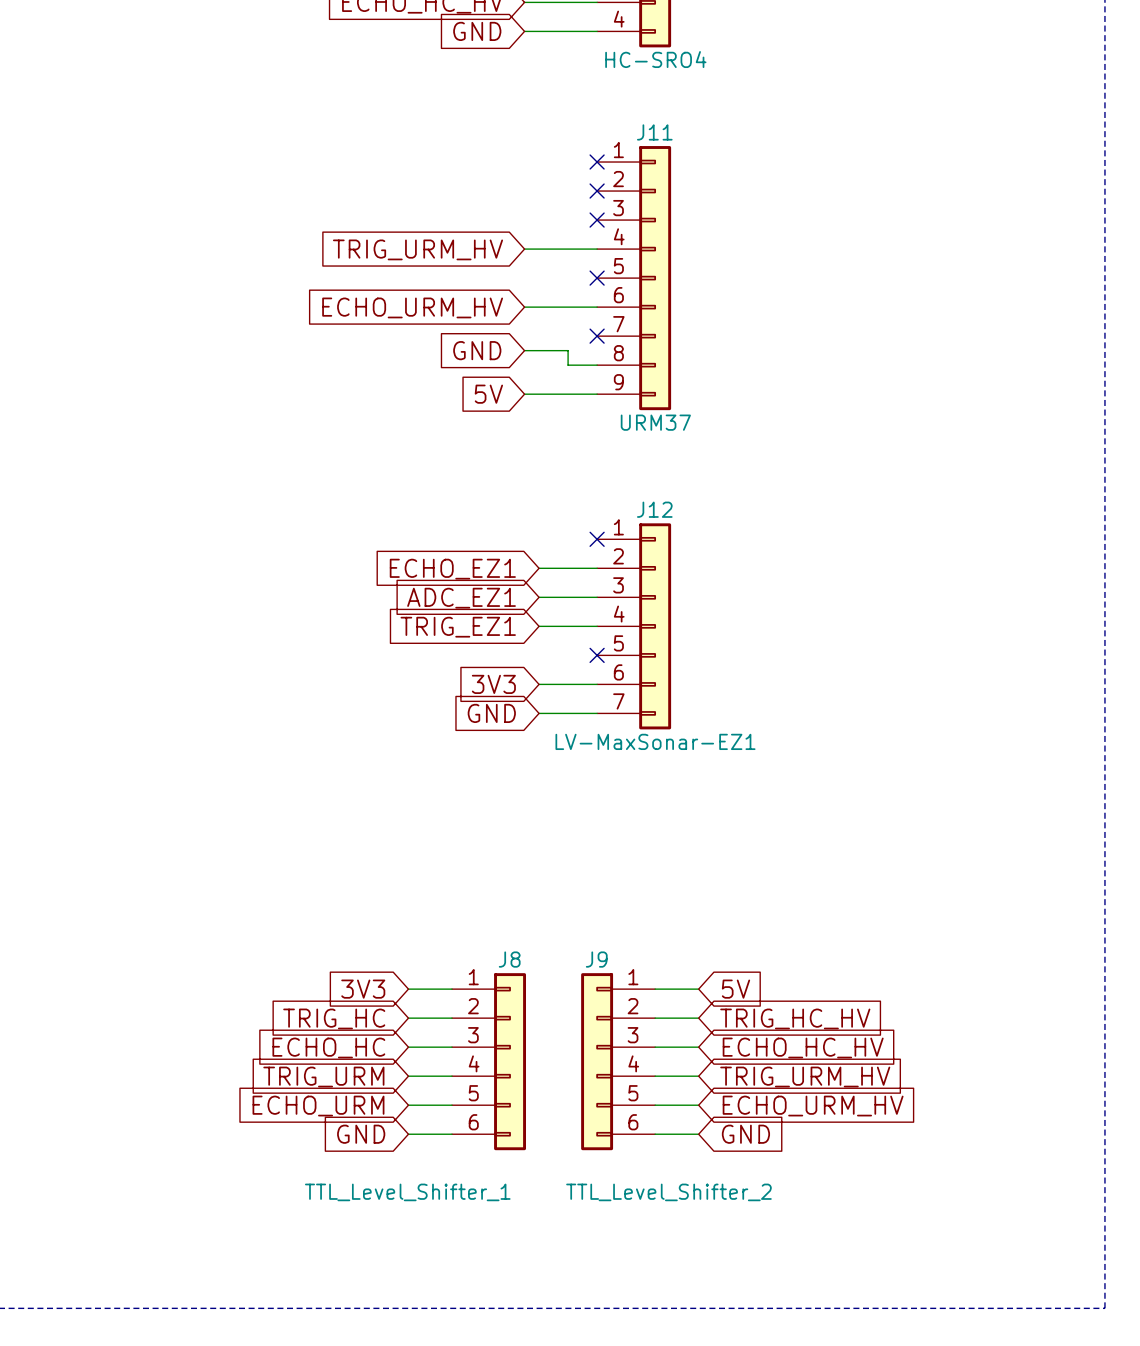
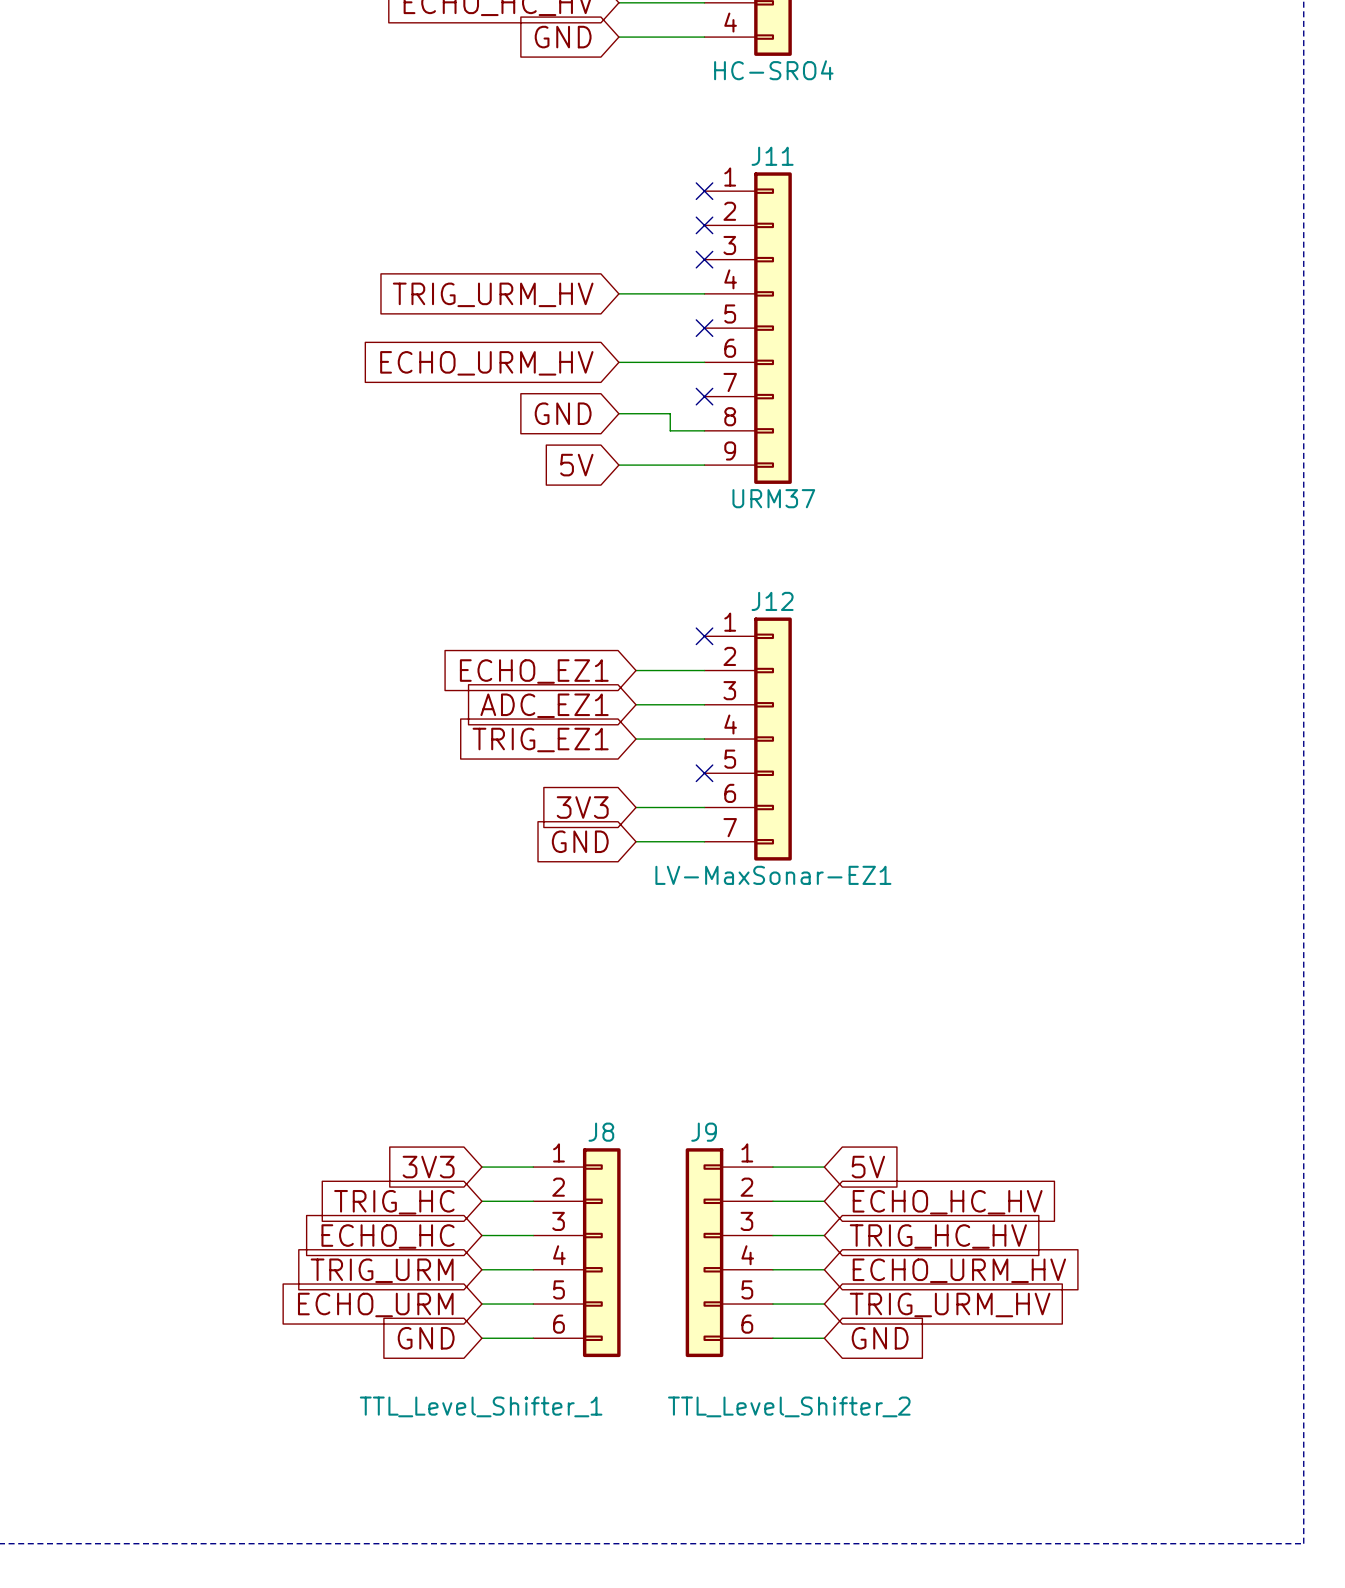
global label: TRIG_HC_HV (795, 1018) -> ECHO_HC_HV (947, 1202)
global label: ECHO_HC_HV (803, 1047) -> TRIG_HC_HV (938, 1236)
global label: TRIG_URM_HV (805, 1077) -> ECHO_URM_HV (959, 1270)
global label: ECHO_URM_HV (813, 1106) -> TRIG_URM_HV (950, 1304)

